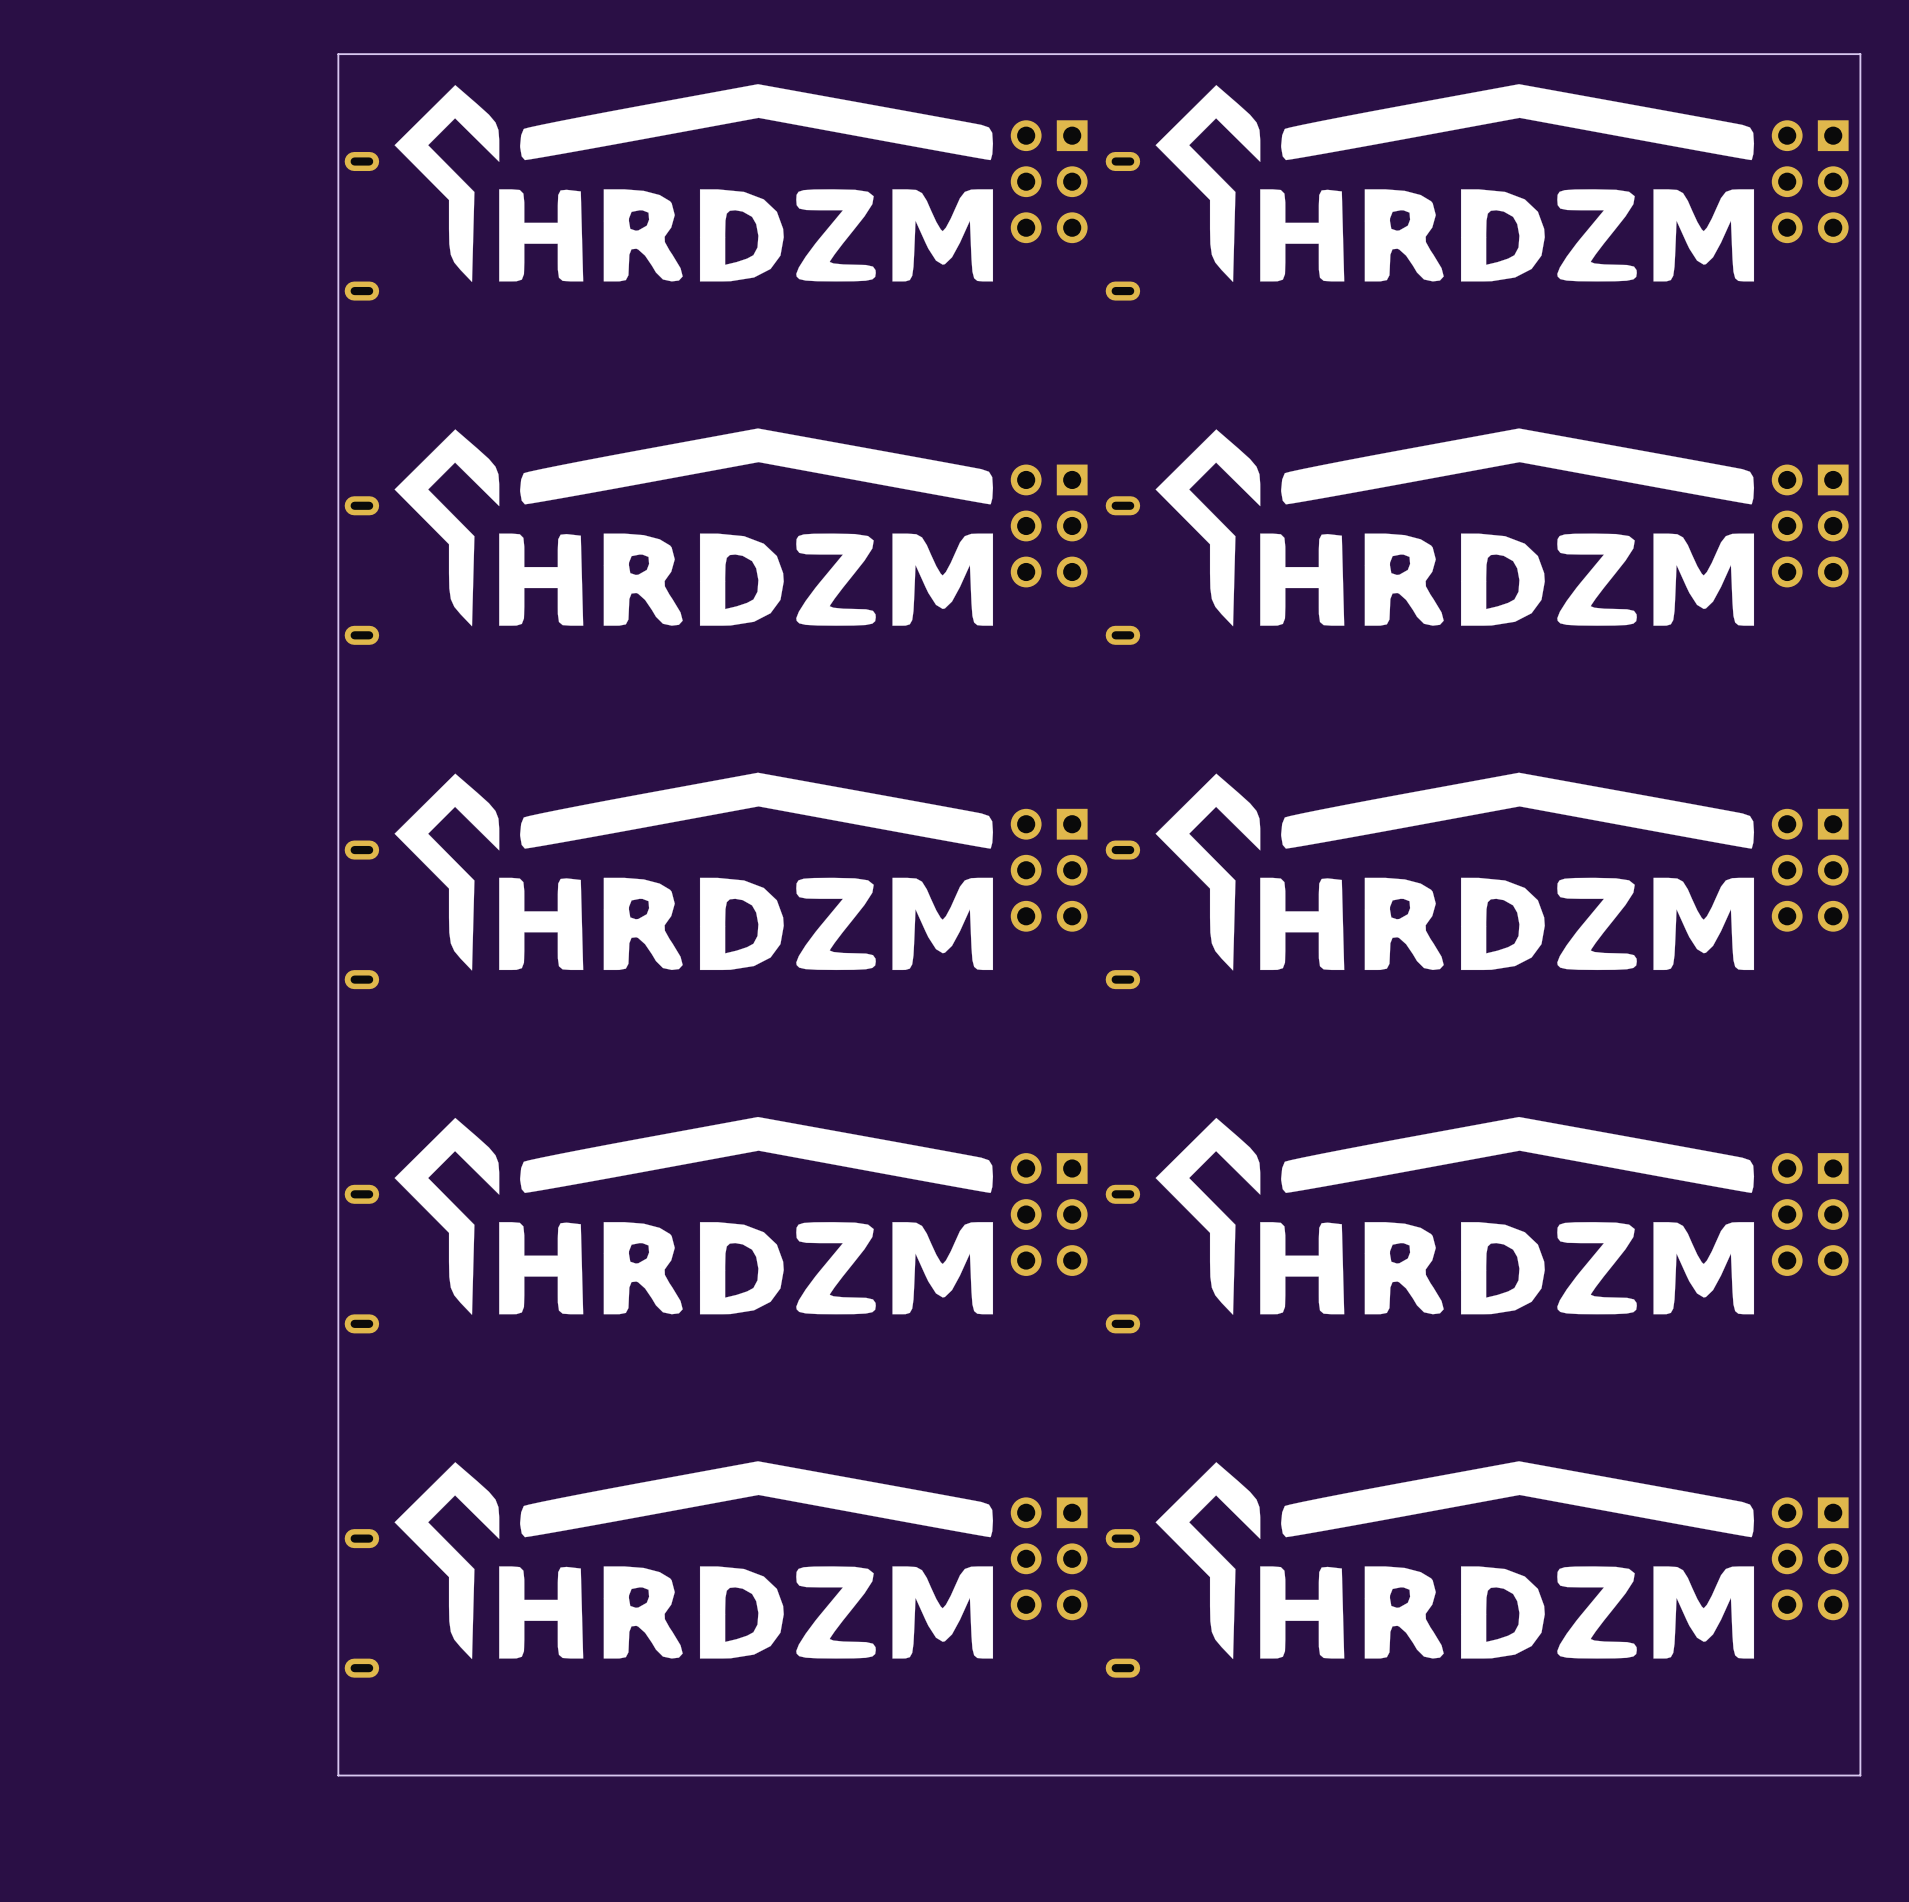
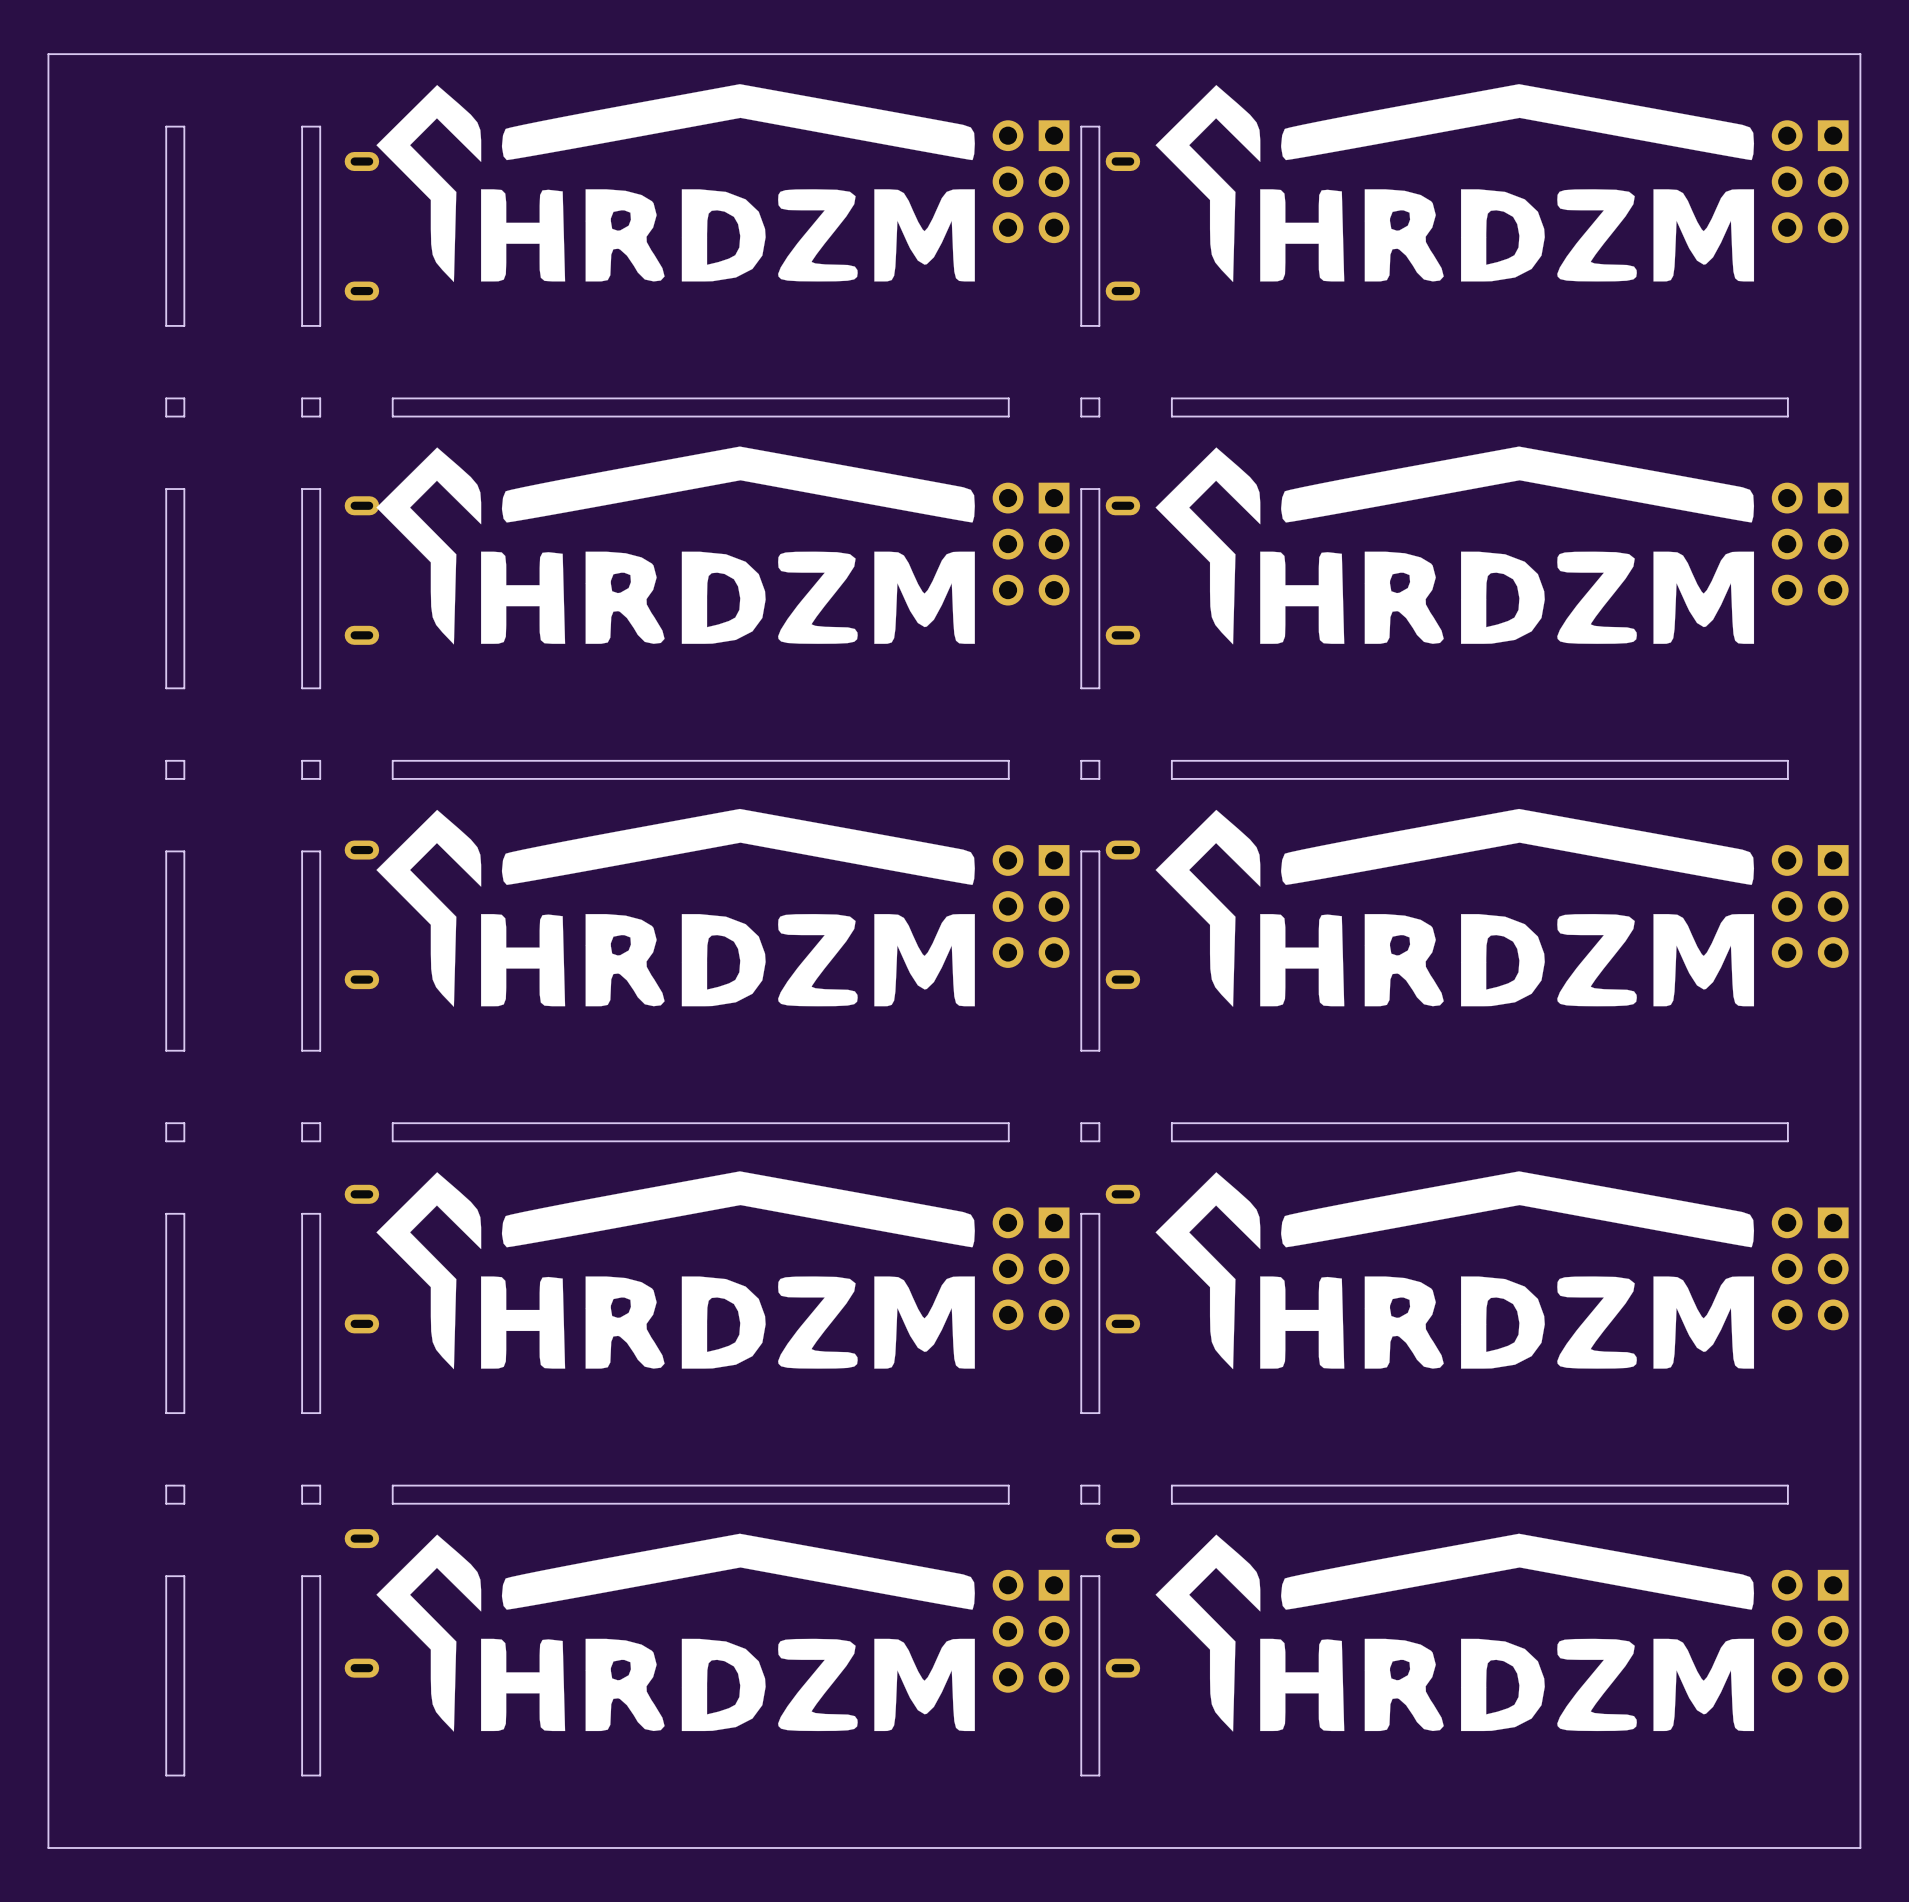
board edge: (338, 54) (338, 1775) (1081, 1775) -> (338, 54) (48, 54) (48, 1847) (1860, 1847) (1860, 1775)
board edge: none -> (184, 126) (184, 325) (166, 325) (166, 126) (184, 126)
board edge: none -> (320, 126) (302, 126) (302, 325) (320, 325) (320, 126)
board edge: none -> (1099, 126) (1081, 126) (1081, 325) (1099, 325) (1099, 126)
part position: (1049, 181) -> (1031, 181)
drawing position: (693, 183) -> (675, 183)
board edge: none -> (184, 398) (184, 416) (166, 416) (166, 398) (184, 398)
board edge: none -> (320, 398) (302, 398) (302, 416) (320, 416) (320, 398)
board edge: none -> (1008, 398) (392, 398) (392, 416) (1008, 416) (1008, 398)
board edge: none -> (1099, 398) (1081, 398) (1081, 416) (1099, 416) (1099, 398)
board edge: none -> (1787, 398) (1171, 398) (1171, 416) (1787, 416) (1787, 398)
board edge: none -> (184, 489) (184, 688) (166, 688) (166, 489) (184, 489)
board edge: none -> (320, 489) (302, 489) (302, 688) (320, 688) (320, 489)
board edge: none -> (1099, 489) (1081, 489) (1081, 688) (1099, 688) (1099, 489)
part position: (1049, 525) -> (1031, 544)
part position: (1810, 525) -> (1810, 544)
drawing position: (693, 527) -> (675, 545)
drawing position: (1454, 527) -> (1454, 545)
board edge: none -> (184, 760) (184, 778) (166, 778) (166, 760) (184, 760)
board edge: none -> (320, 760) (302, 760) (302, 778) (320, 778) (320, 760)
board edge: none -> (1008, 760) (392, 760) (392, 778) (1008, 778) (1008, 760)
board edge: none -> (1099, 760) (1081, 760) (1081, 778) (1099, 778) (1099, 760)
board edge: none -> (1787, 760) (1171, 760) (1171, 778) (1787, 778) (1787, 760)
board edge: none -> (184, 851) (184, 1050) (166, 1050) (166, 851) (184, 851)
board edge: none -> (320, 851) (302, 851) (302, 1050) (320, 1050) (320, 851)
board edge: none -> (1099, 851) (1081, 851) (1081, 1050) (1099, 1050) (1099, 851)
part position: (1049, 870) -> (1031, 906)
part position: (1810, 870) -> (1810, 906)
drawing position: (693, 871) -> (675, 907)
drawing position: (1454, 871) -> (1454, 907)
board edge: none -> (184, 1123) (184, 1141) (166, 1141) (166, 1123) (184, 1123)
board edge: none -> (320, 1123) (302, 1123) (302, 1141) (320, 1141) (320, 1123)
board edge: none -> (1008, 1123) (392, 1123) (392, 1141) (1008, 1141) (1008, 1123)
board edge: none -> (1099, 1123) (1081, 1123) (1081, 1141) (1099, 1141) (1099, 1123)
board edge: none -> (1787, 1123) (1171, 1123) (1171, 1141) (1787, 1141) (1787, 1123)
board edge: none -> (184, 1213) (184, 1413) (166, 1413) (166, 1213) (184, 1213)
board edge: none -> (320, 1213) (302, 1213) (302, 1413) (320, 1413) (320, 1213)
board edge: none -> (1099, 1213) (1081, 1213) (1081, 1413) (1099, 1413) (1099, 1213)
part position: (1049, 1214) -> (1031, 1268)
part position: (1810, 1214) -> (1810, 1268)
drawing position: (693, 1215) -> (675, 1270)
drawing position: (1454, 1215) -> (1454, 1270)
board edge: none -> (184, 1485) (184, 1503) (166, 1503) (166, 1485) (184, 1485)
board edge: none -> (320, 1485) (302, 1485) (302, 1503) (320, 1503) (320, 1485)
board edge: none -> (1008, 1485) (392, 1485) (392, 1503) (1008, 1503) (1008, 1485)
board edge: none -> (1099, 1485) (1081, 1485) (1081, 1503) (1099, 1503) (1099, 1485)
board edge: none -> (1787, 1485) (1171, 1485) (1171, 1503) (1787, 1503) (1787, 1485)
part position: (1049, 1558) -> (1031, 1631)
part position: (1810, 1558) -> (1810, 1631)
drawing position: (693, 1560) -> (675, 1632)
drawing position: (1454, 1560) -> (1454, 1632)
board edge: none -> (184, 1576) (184, 1775) (166, 1775) (166, 1576) (184, 1576)
board edge: none -> (320, 1576) (302, 1576) (302, 1775) (320, 1775) (320, 1576)
board edge: (1860, 1775) (1099, 1775) -> (1081, 1775) (1081, 1576) (1099, 1576) (1099, 1775)

